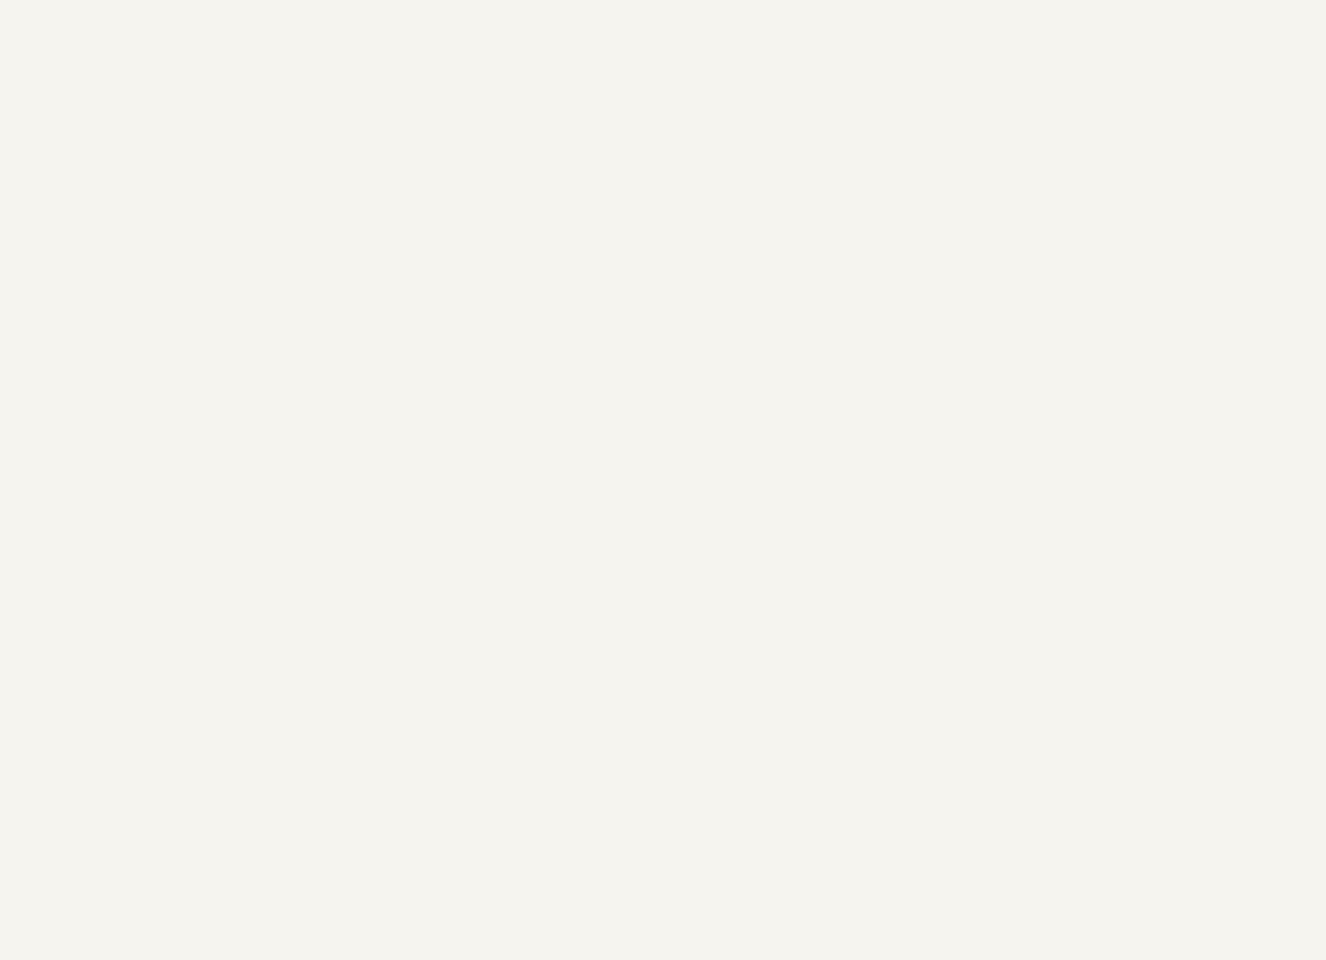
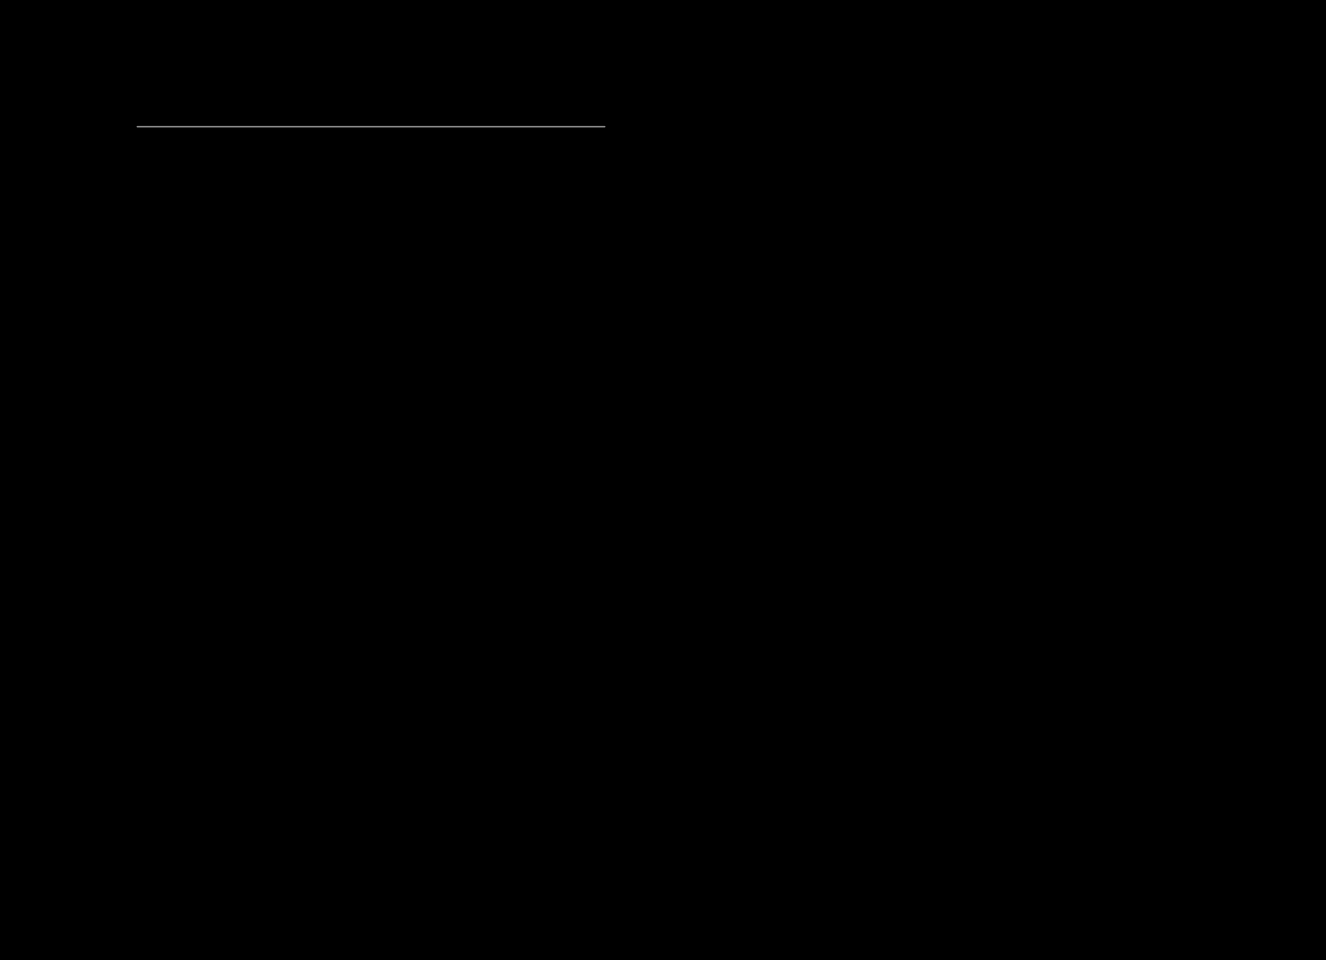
bus: none -> (137, 126) (604, 126)

